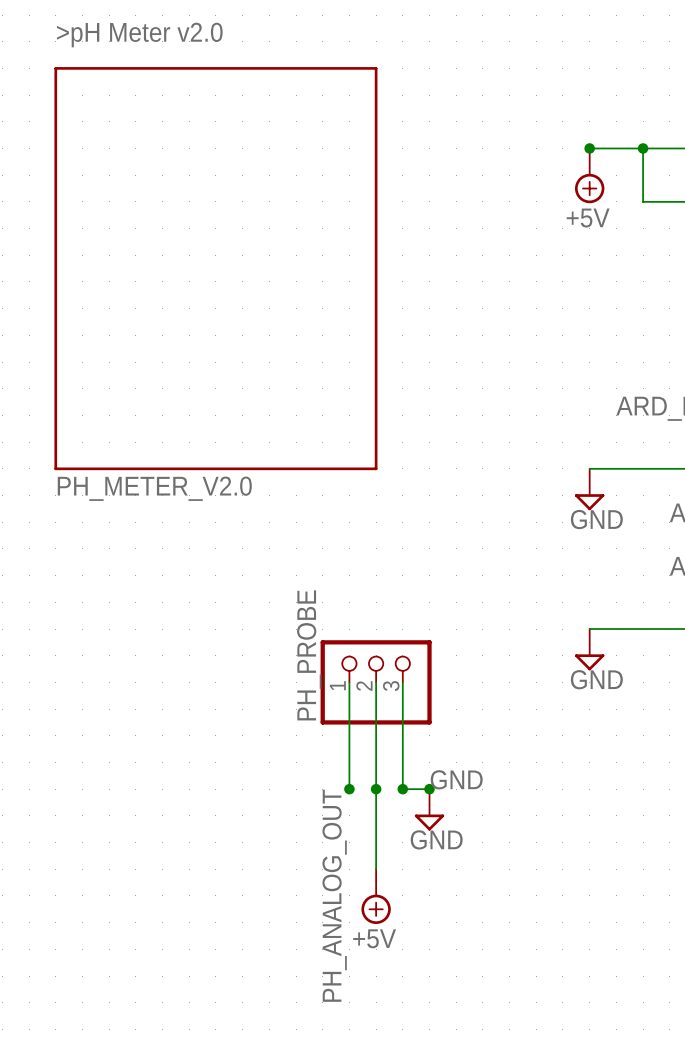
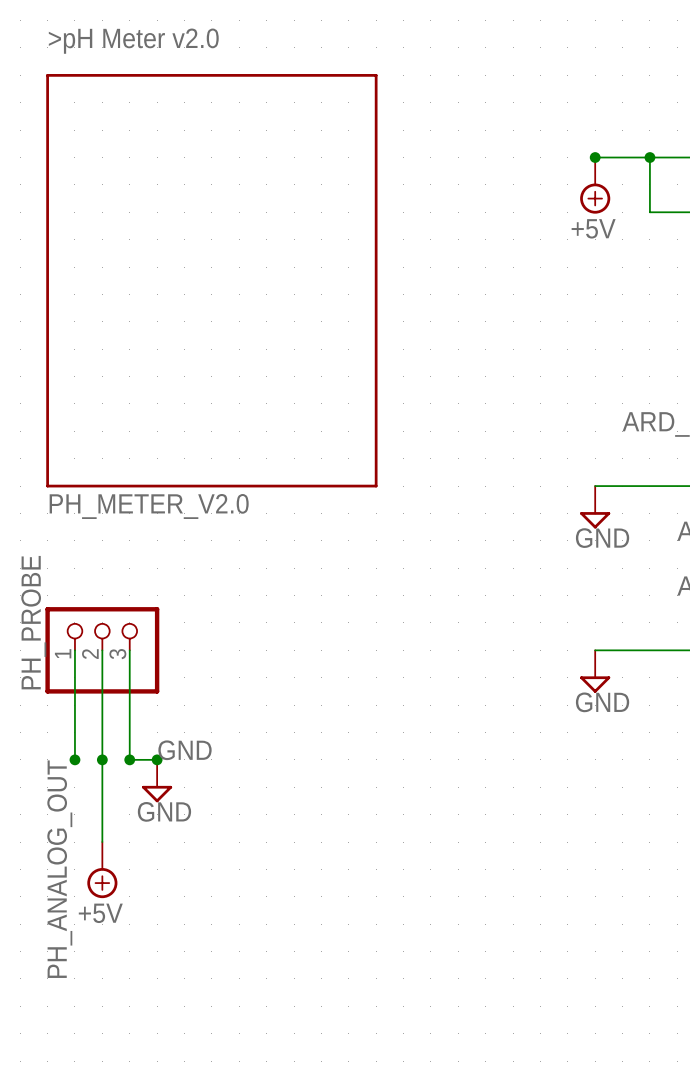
wire: none -> (74, 650) (74, 759)
wire: none -> (102, 650) (102, 842)
PH_PROBE: none -> (102, 650)
wire: none -> (129, 650) (129, 759) (157, 759)
wire: (349, 682) (349, 789) -> none
wire: (376, 682) (376, 869) -> none
PH_PROBE: (376, 682) -> none
wire: (402, 682) (402, 789) (429, 789) -> none
label: none -> GND (185, 750)
junction: none -> (74, 759)
junction: none -> (102, 759)
junction: none -> (129, 759)
junction: none -> (157, 759)
power symbol: none -> GND (157, 781)
label: GND (456, 779) -> none
junction: (349, 789) -> none
junction: (376, 789) -> none
junction: (402, 789) -> none
junction: (429, 789) -> none
power symbol: GND (429, 809) -> none
label: none -> PH_ANALOG_OUT (59, 869)
power symbol: none -> +5V (102, 870)
label: PH_ANALOG_OUT (334, 895) -> none
power symbol: +5V (376, 896) -> none

